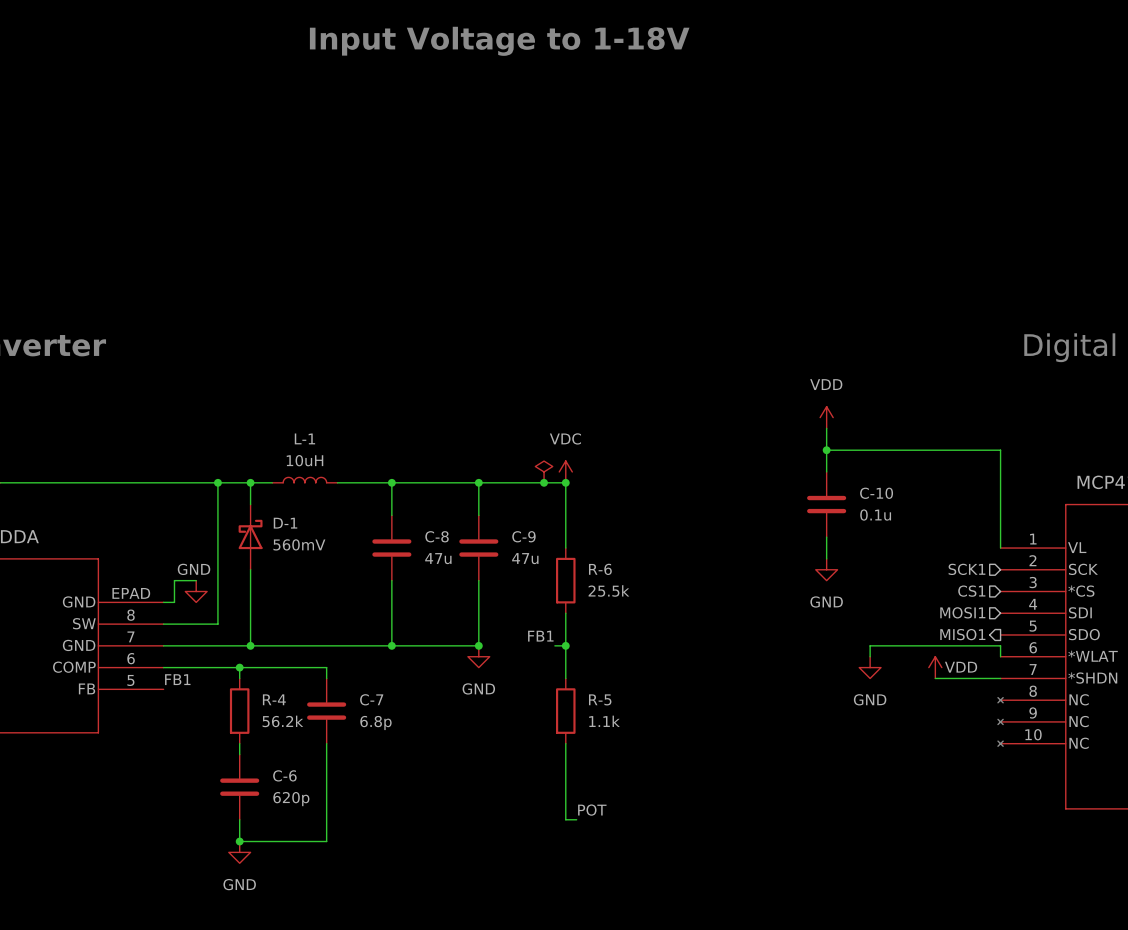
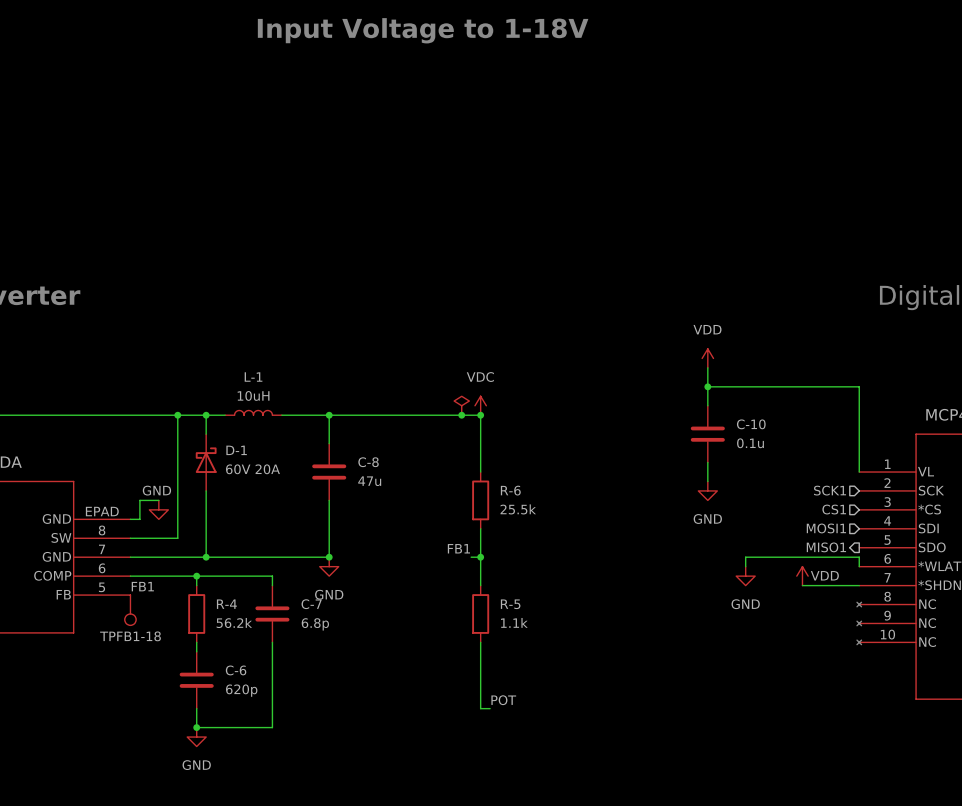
wire: (478, 482) (478, 515) -> none
junction: (478, 482) -> none
D-1 value: 560mV (299, 544) -> 60V 20A (252, 469)
C-9: 47u (478, 548) -> none
wire: (478, 580) (478, 645) (391, 645) -> none
junction: (478, 645) -> none
power symbol position: GND (478, 656) -> GND (329, 566)
TPFB1-18: none -> (130, 610)

